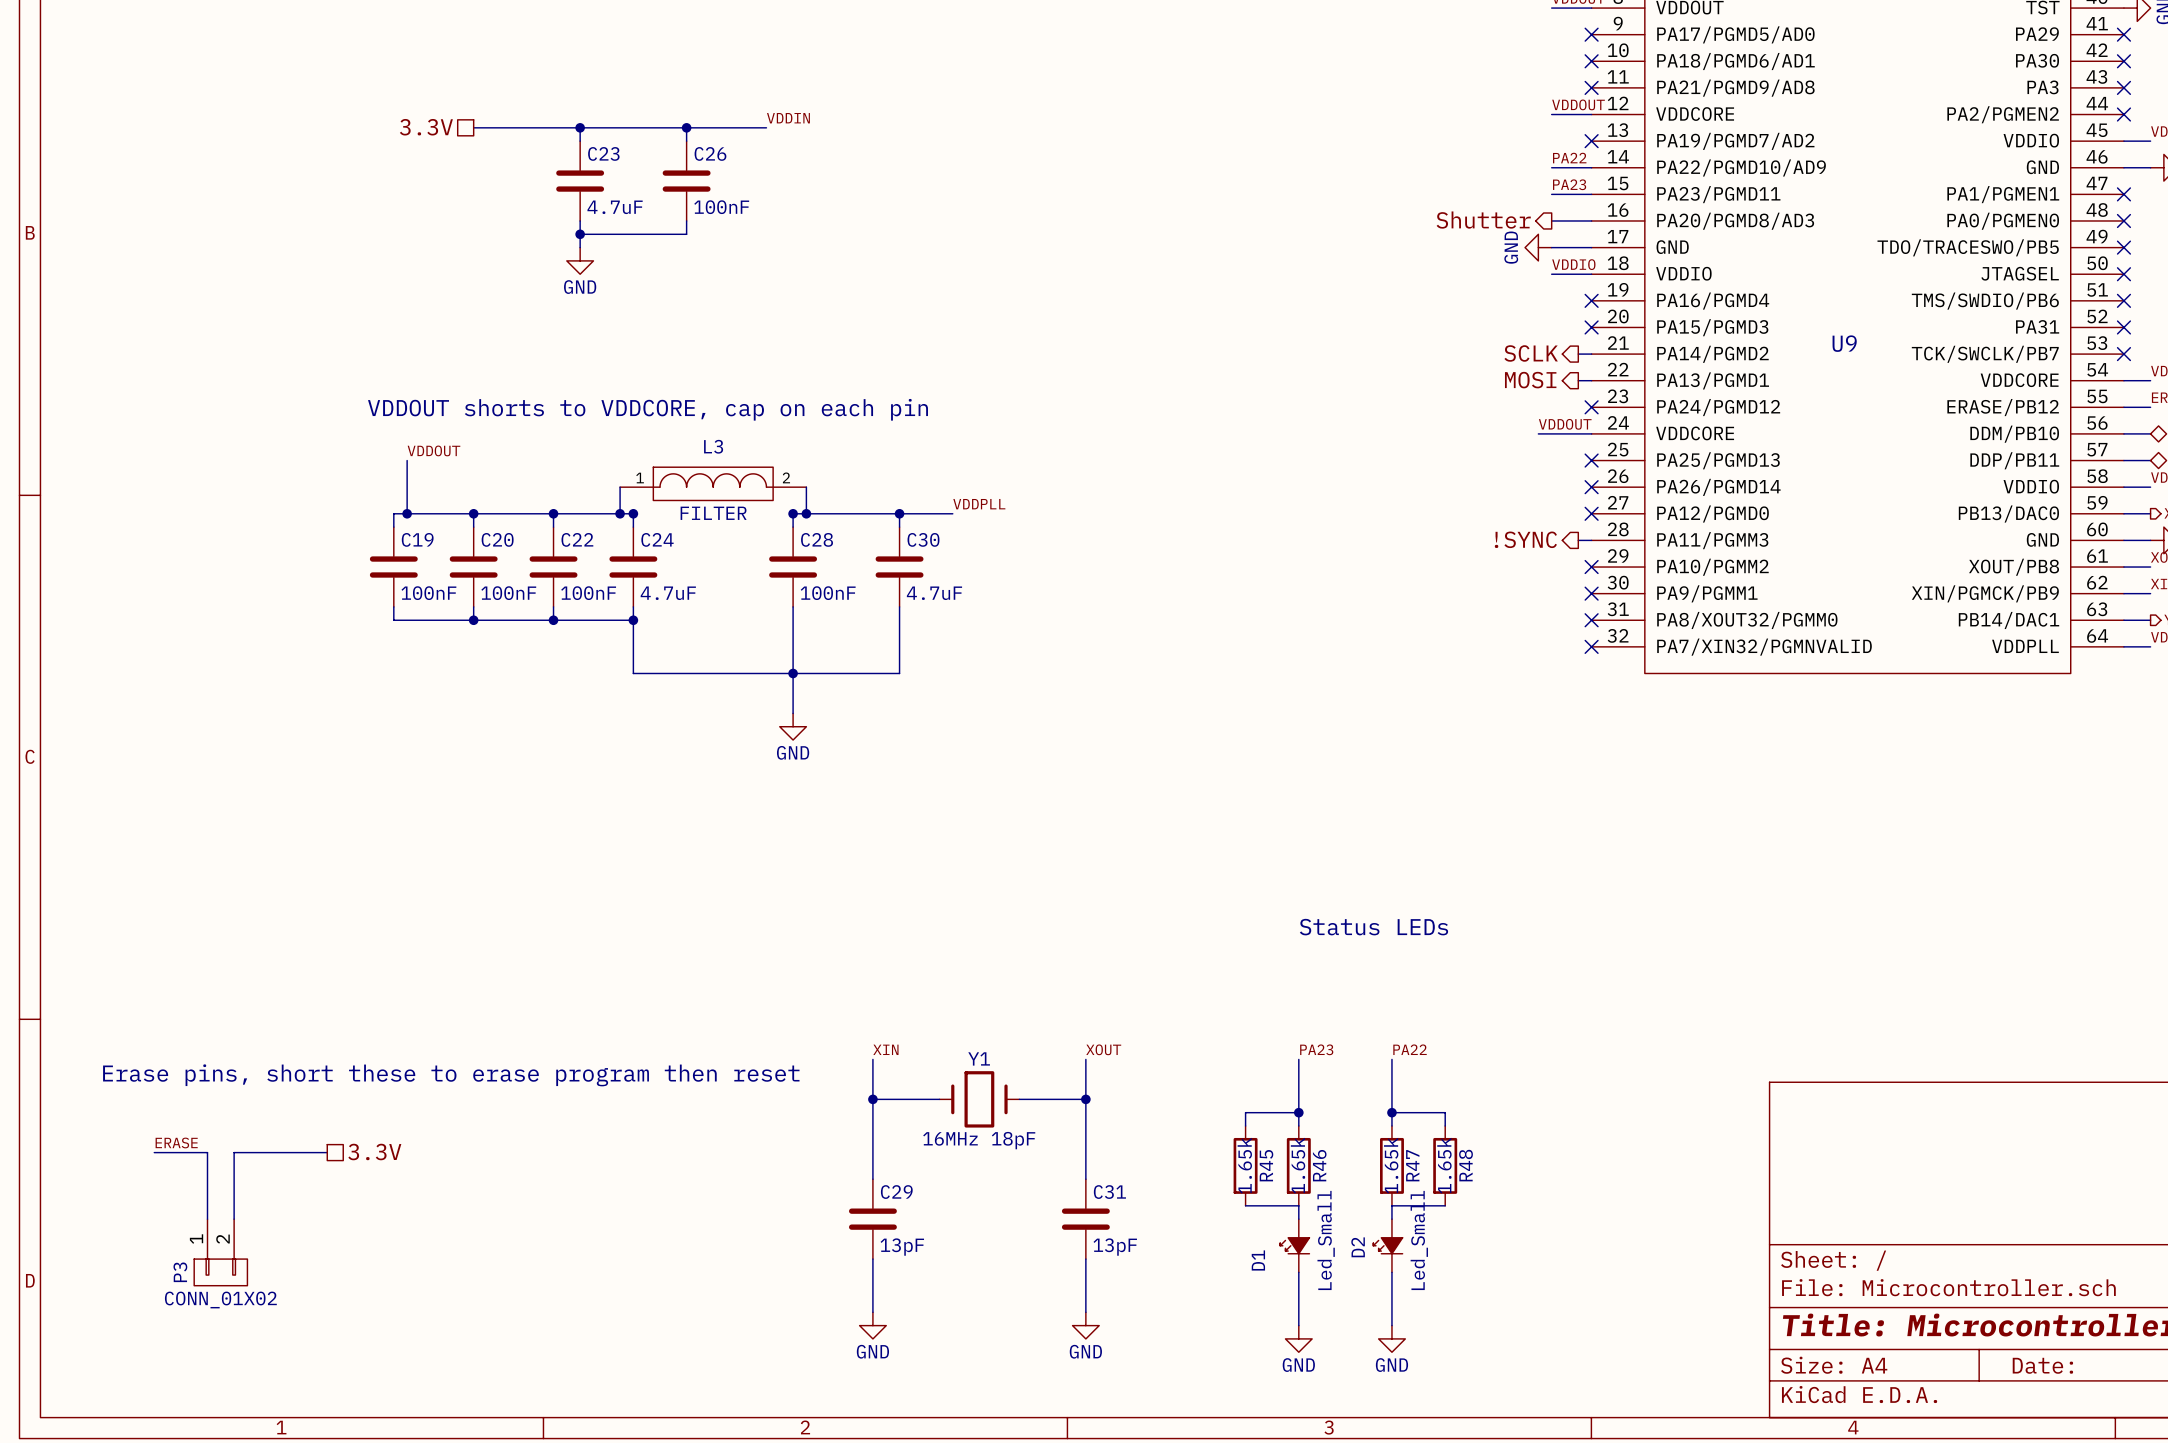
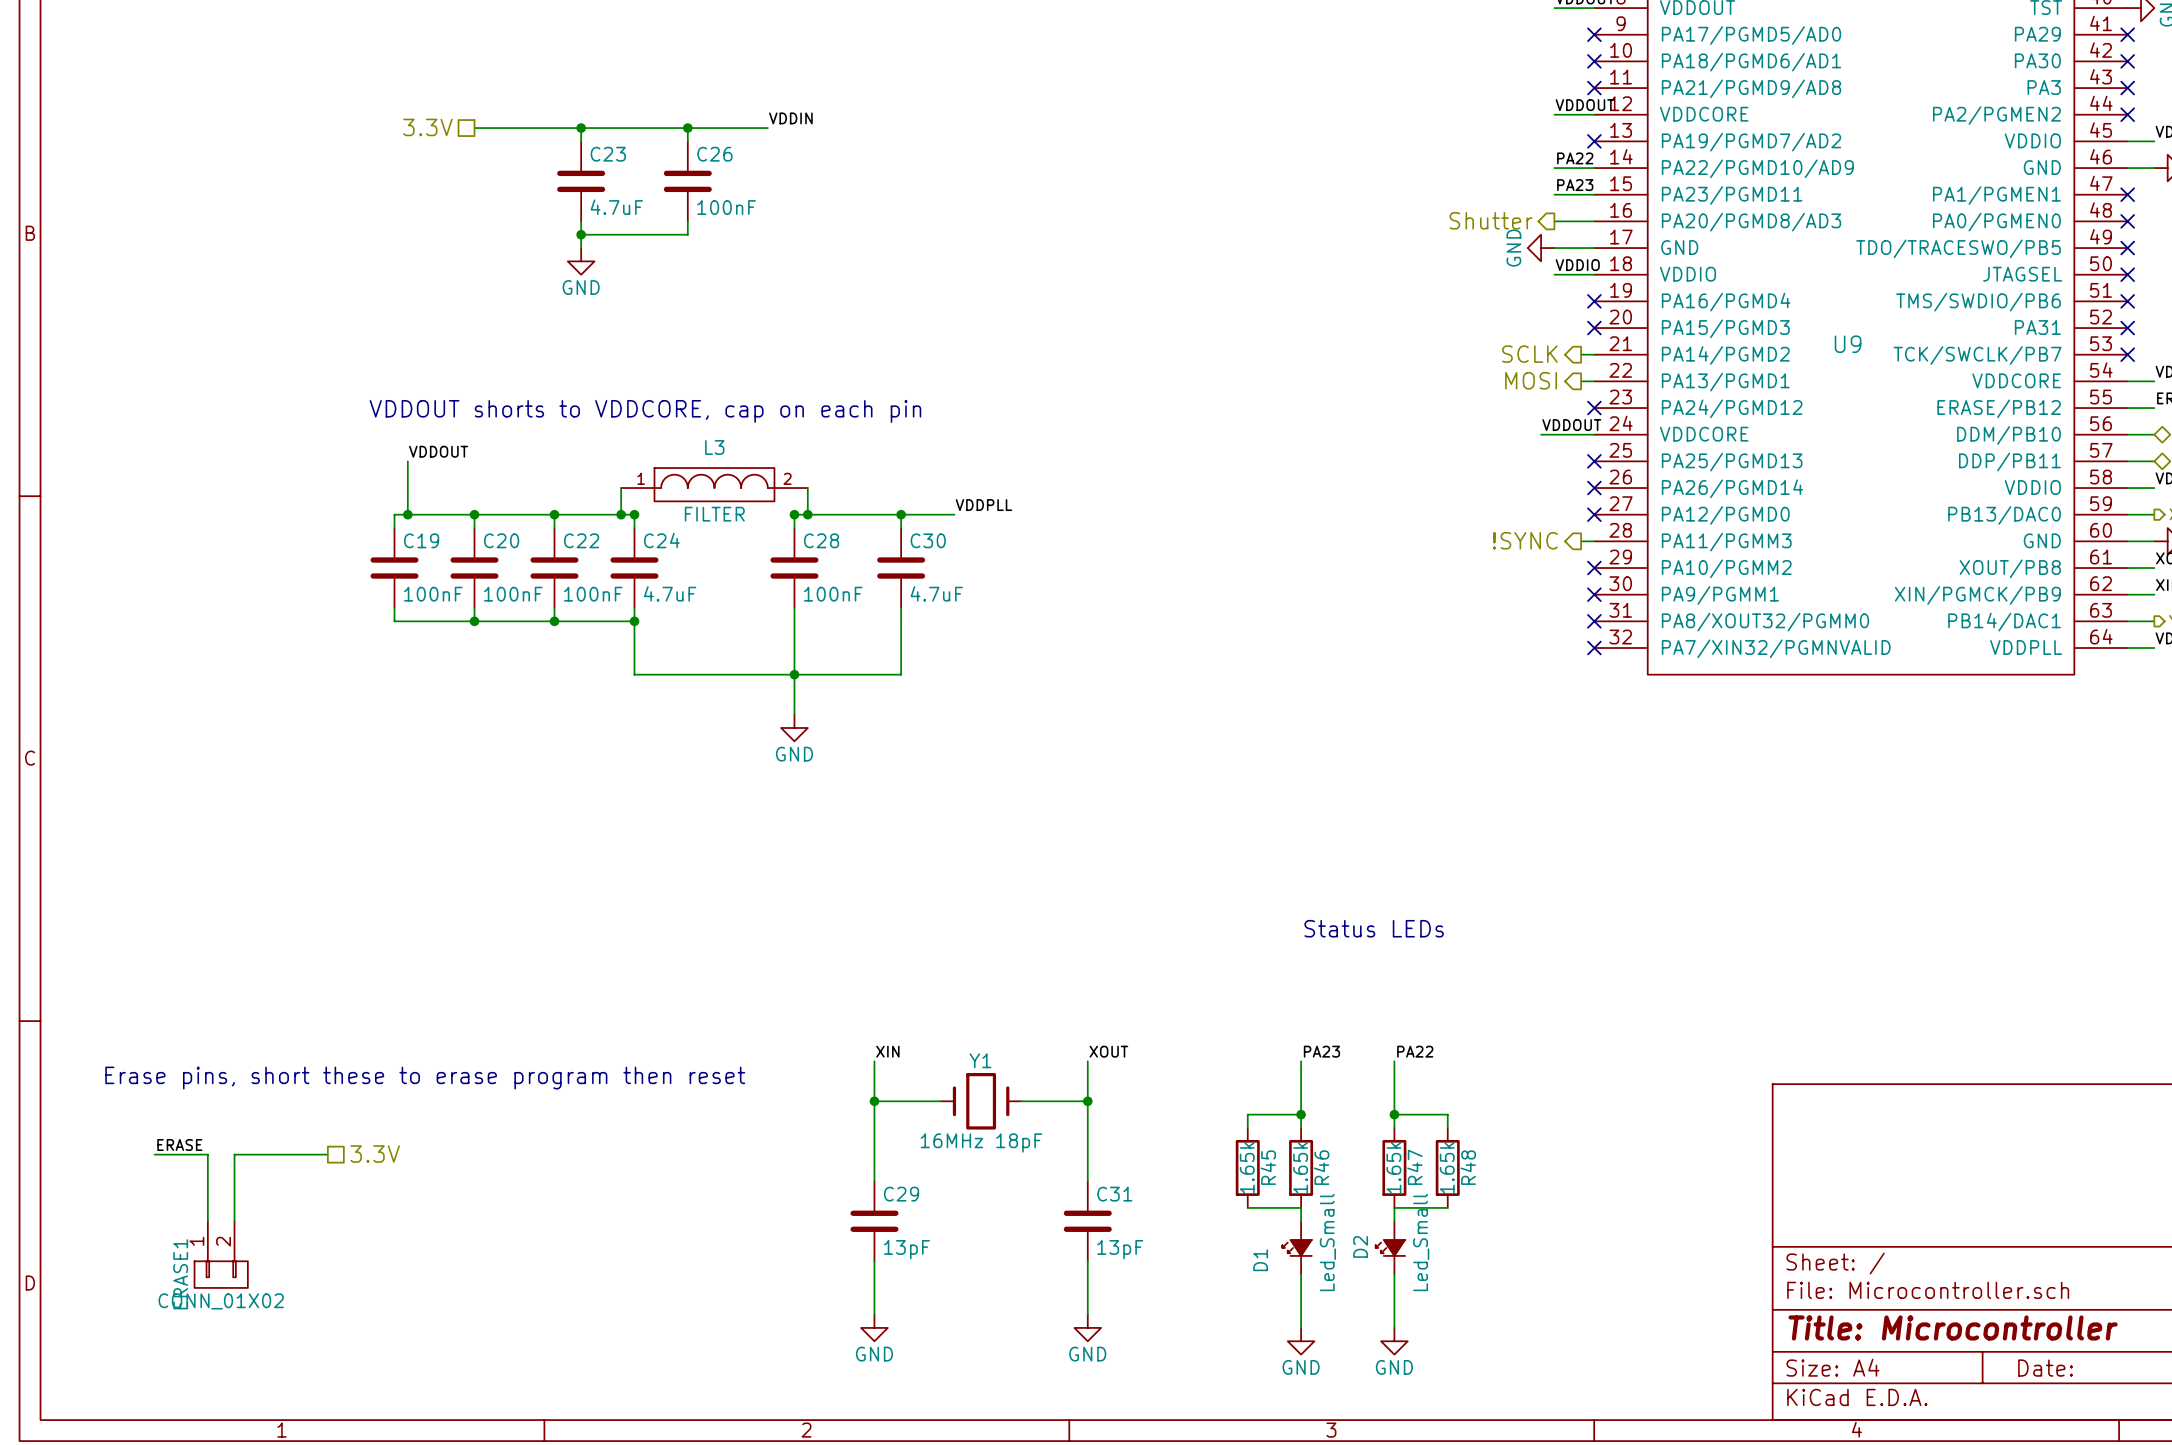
P3 name: P3 (180, 1272) -> ERASE1 (180, 1274)

